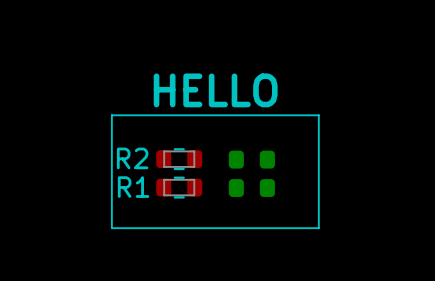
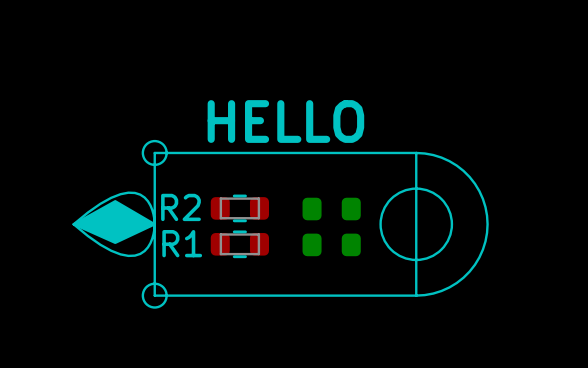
drawing: none -> [141, 139, 168, 167]
line: none -> (416, 152) (441, 157) (463, 170) (479, 191) (485, 207) (487, 224) (485, 241) (479, 257) (463, 277) (441, 290) (416, 295)
drawing: none -> [379, 187, 454, 262]
drawing: none -> [72, 200, 156, 245]
line: none -> (73, 224) (100, 244) (111, 250) (128, 255) (140, 253) (147, 247) (152, 238) (154, 224) (152, 209) (147, 201) (140, 194) (128, 192) (111, 197) (100, 203) (73, 224)
drawing: none -> [141, 282, 168, 309]

